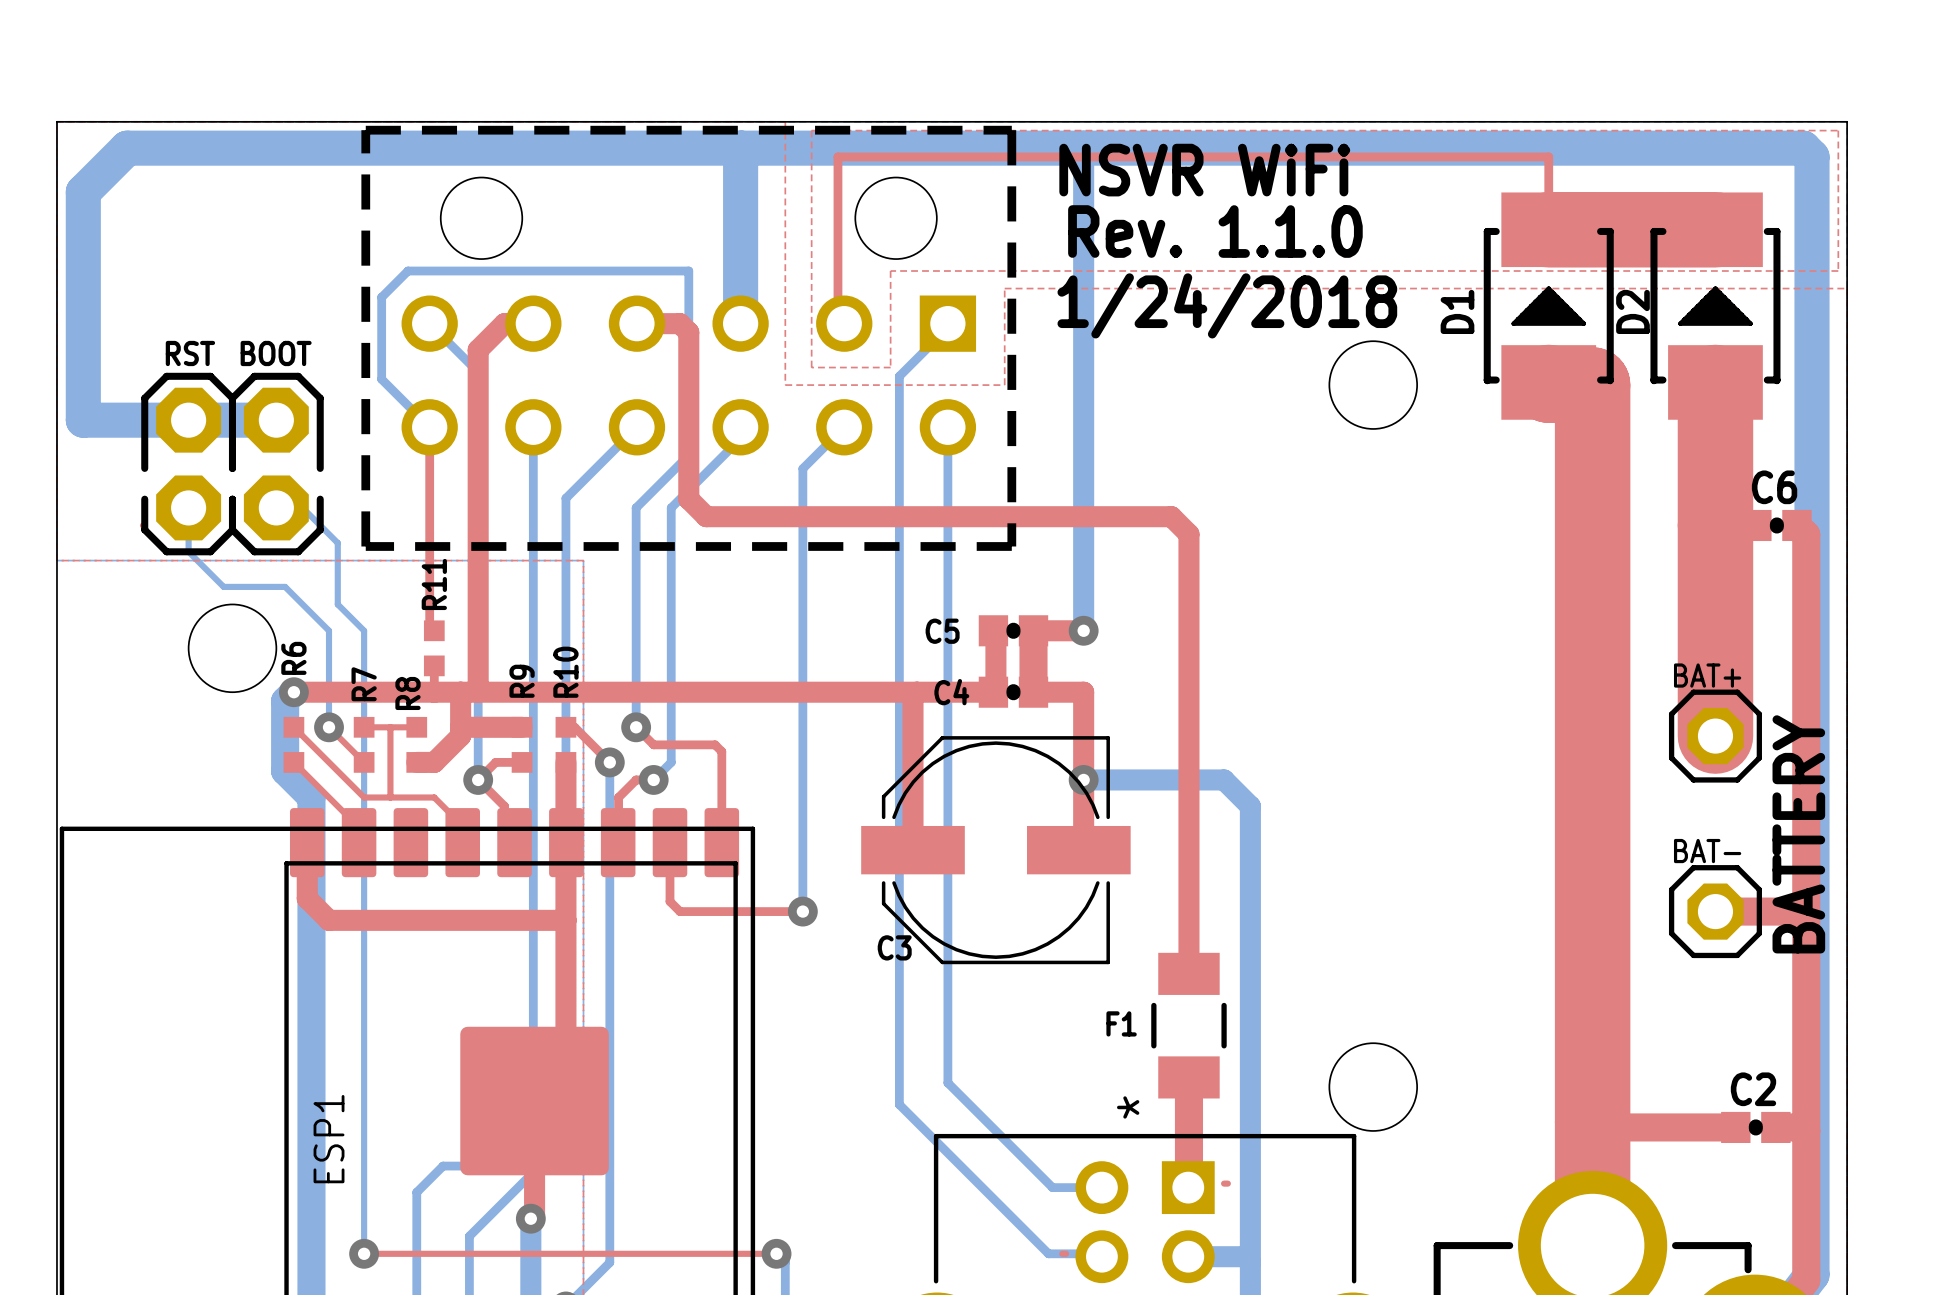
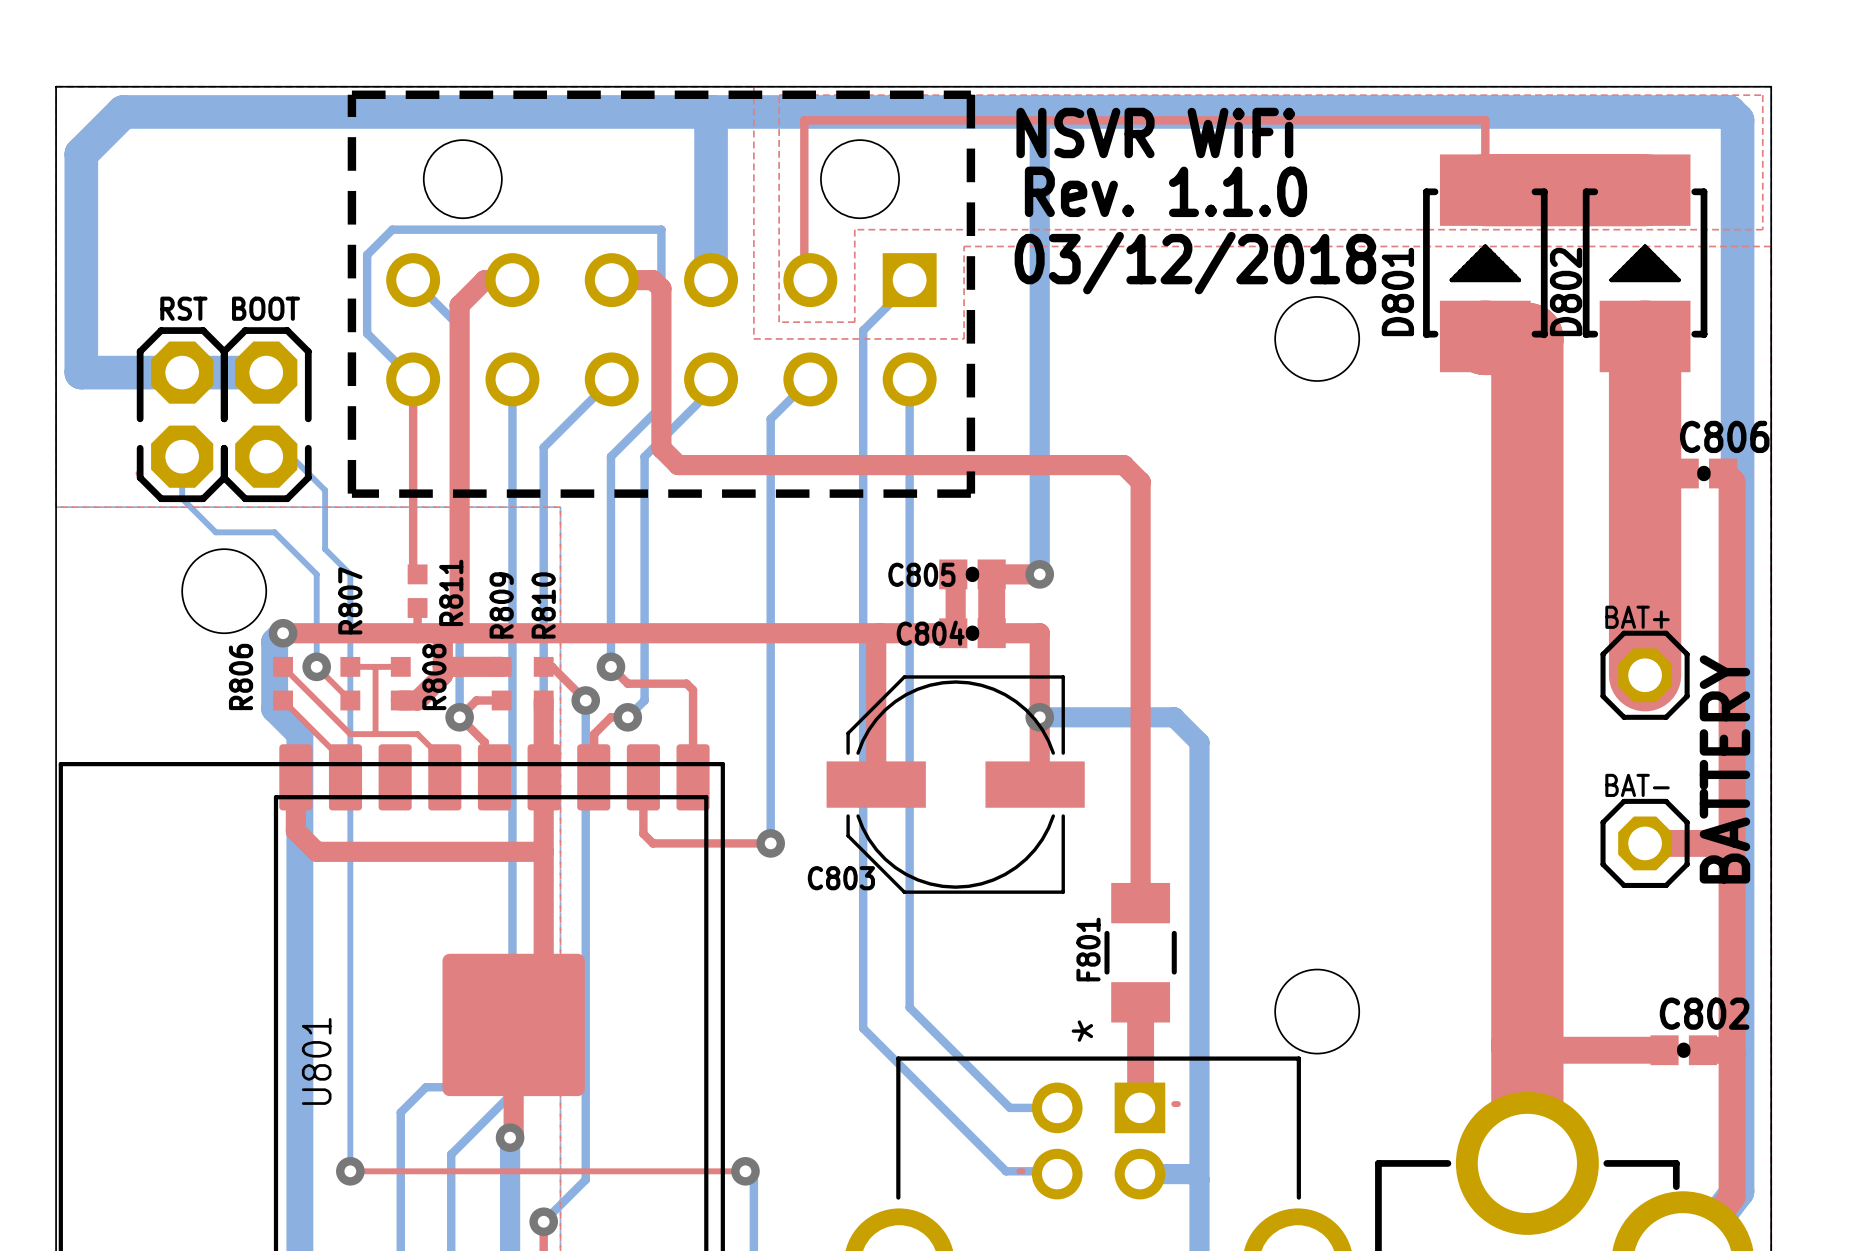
text: 1/24/2018 (1227, 305) -> 03/12/2018 (1195, 263)
D1 name: D1 (1457, 311) -> D801 (1397, 291)
D2 name: D2 (1632, 311) -> D802 (1566, 291)
C6 name: C6 (1774, 487) -> C806 (1724, 436)
R11 name: R11 (434, 584) -> R811 (451, 592)
C5 name: C5 (942, 631) -> C805 (921, 574)
R6 name: R6 (293, 658) -> R806 (241, 676)
R10 name: R10 (565, 672) -> R810 (543, 605)
R9 name: R9 (522, 681) -> R809 (501, 605)
R7 name: R7 (364, 684) -> R807 (350, 600)
C4 name: C4 (951, 692) -> C804 (930, 633)
R8 name: R8 (407, 693) -> R808 (434, 676)
C3 name: C3 (894, 947) -> C803 (841, 878)
text: F1 (1121, 1023) -> F801 (1088, 949)
C2 name: C2 (1753, 1089) -> C802 (1704, 1013)
ESP1 name: ESP1 (329, 1139) -> U801 (316, 1061)

